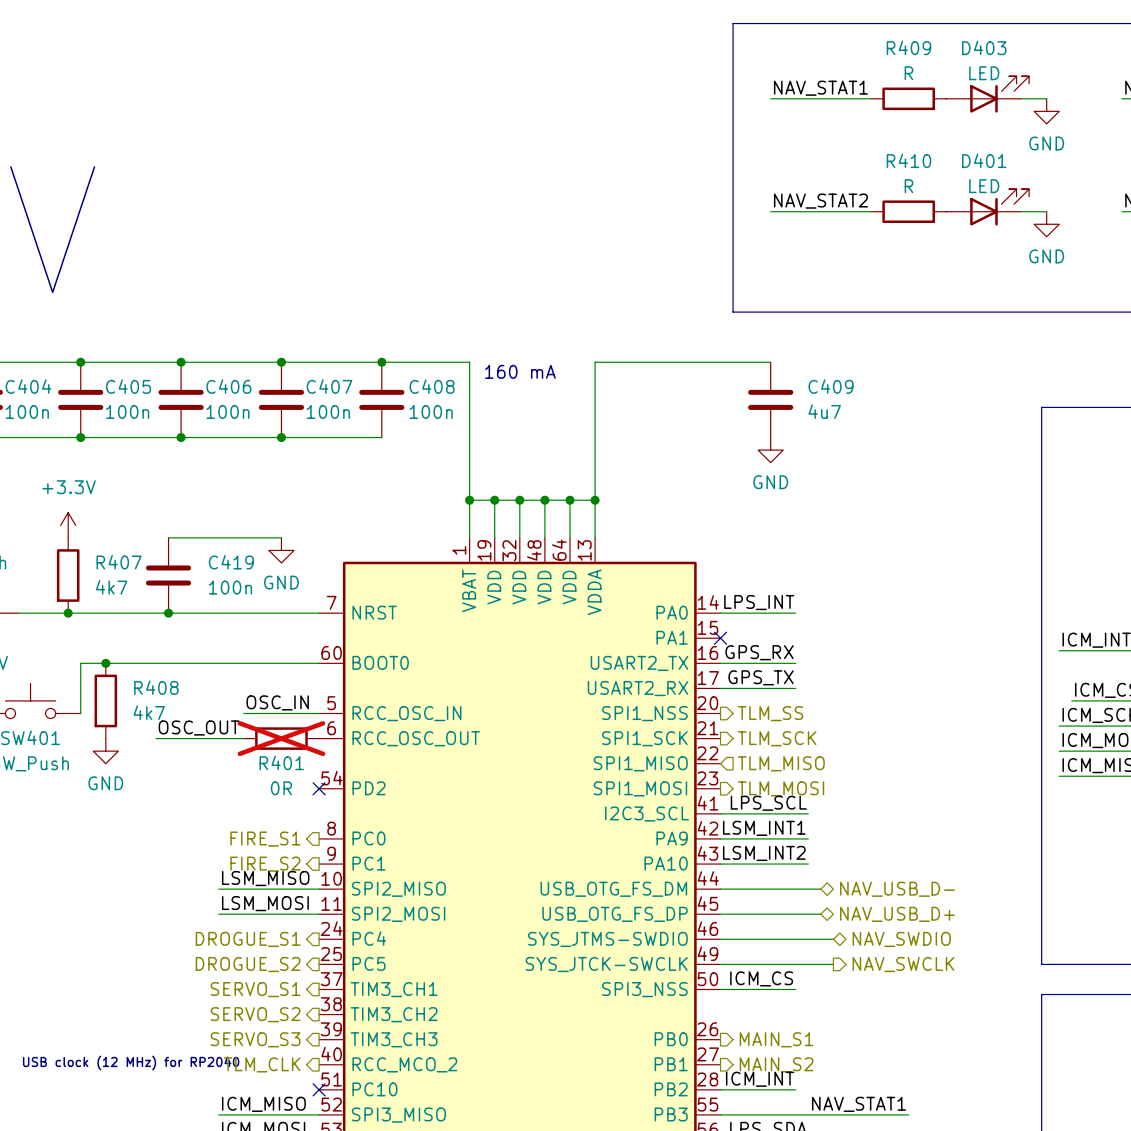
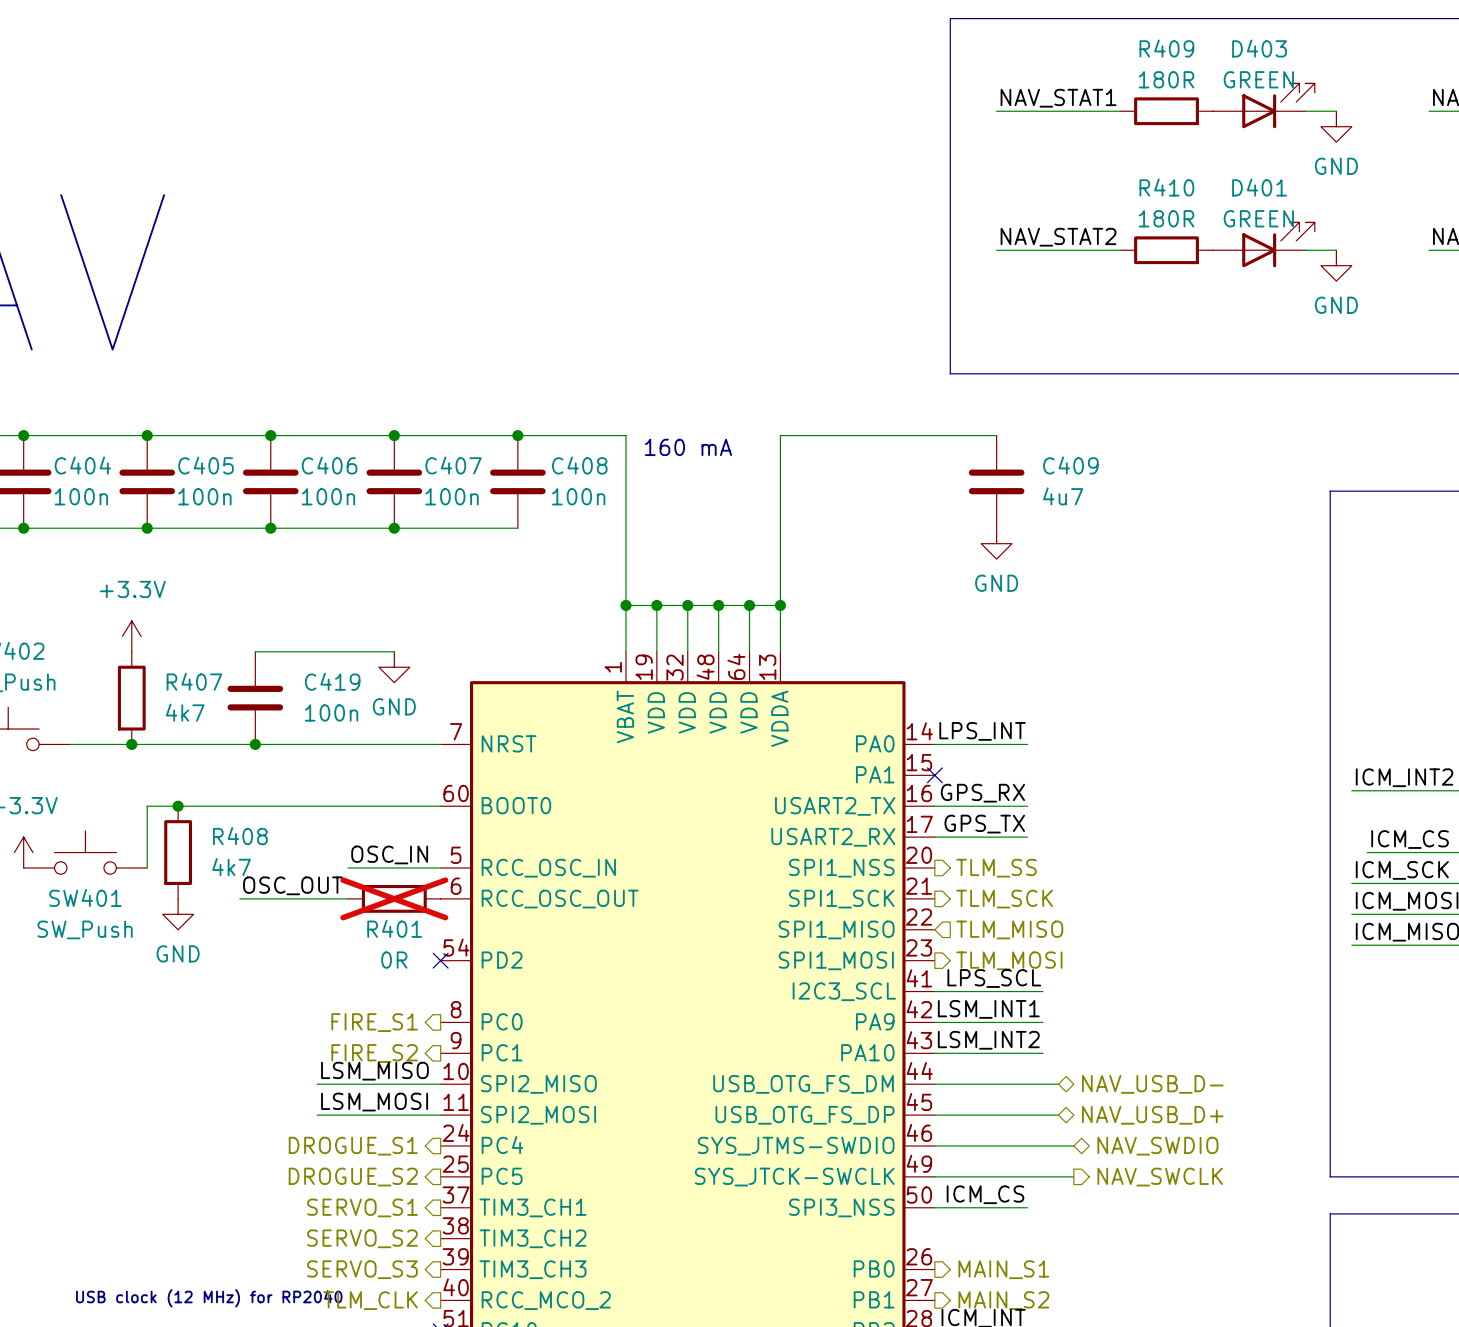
R409 value: R (908, 73) -> 180R (1166, 79)
D403 value: LED (984, 73) -> GREEN (1258, 79)
R410 value: R (908, 186) -> 180R (1166, 218)
D401 value: LED (984, 186) -> GREEN (1258, 218)

